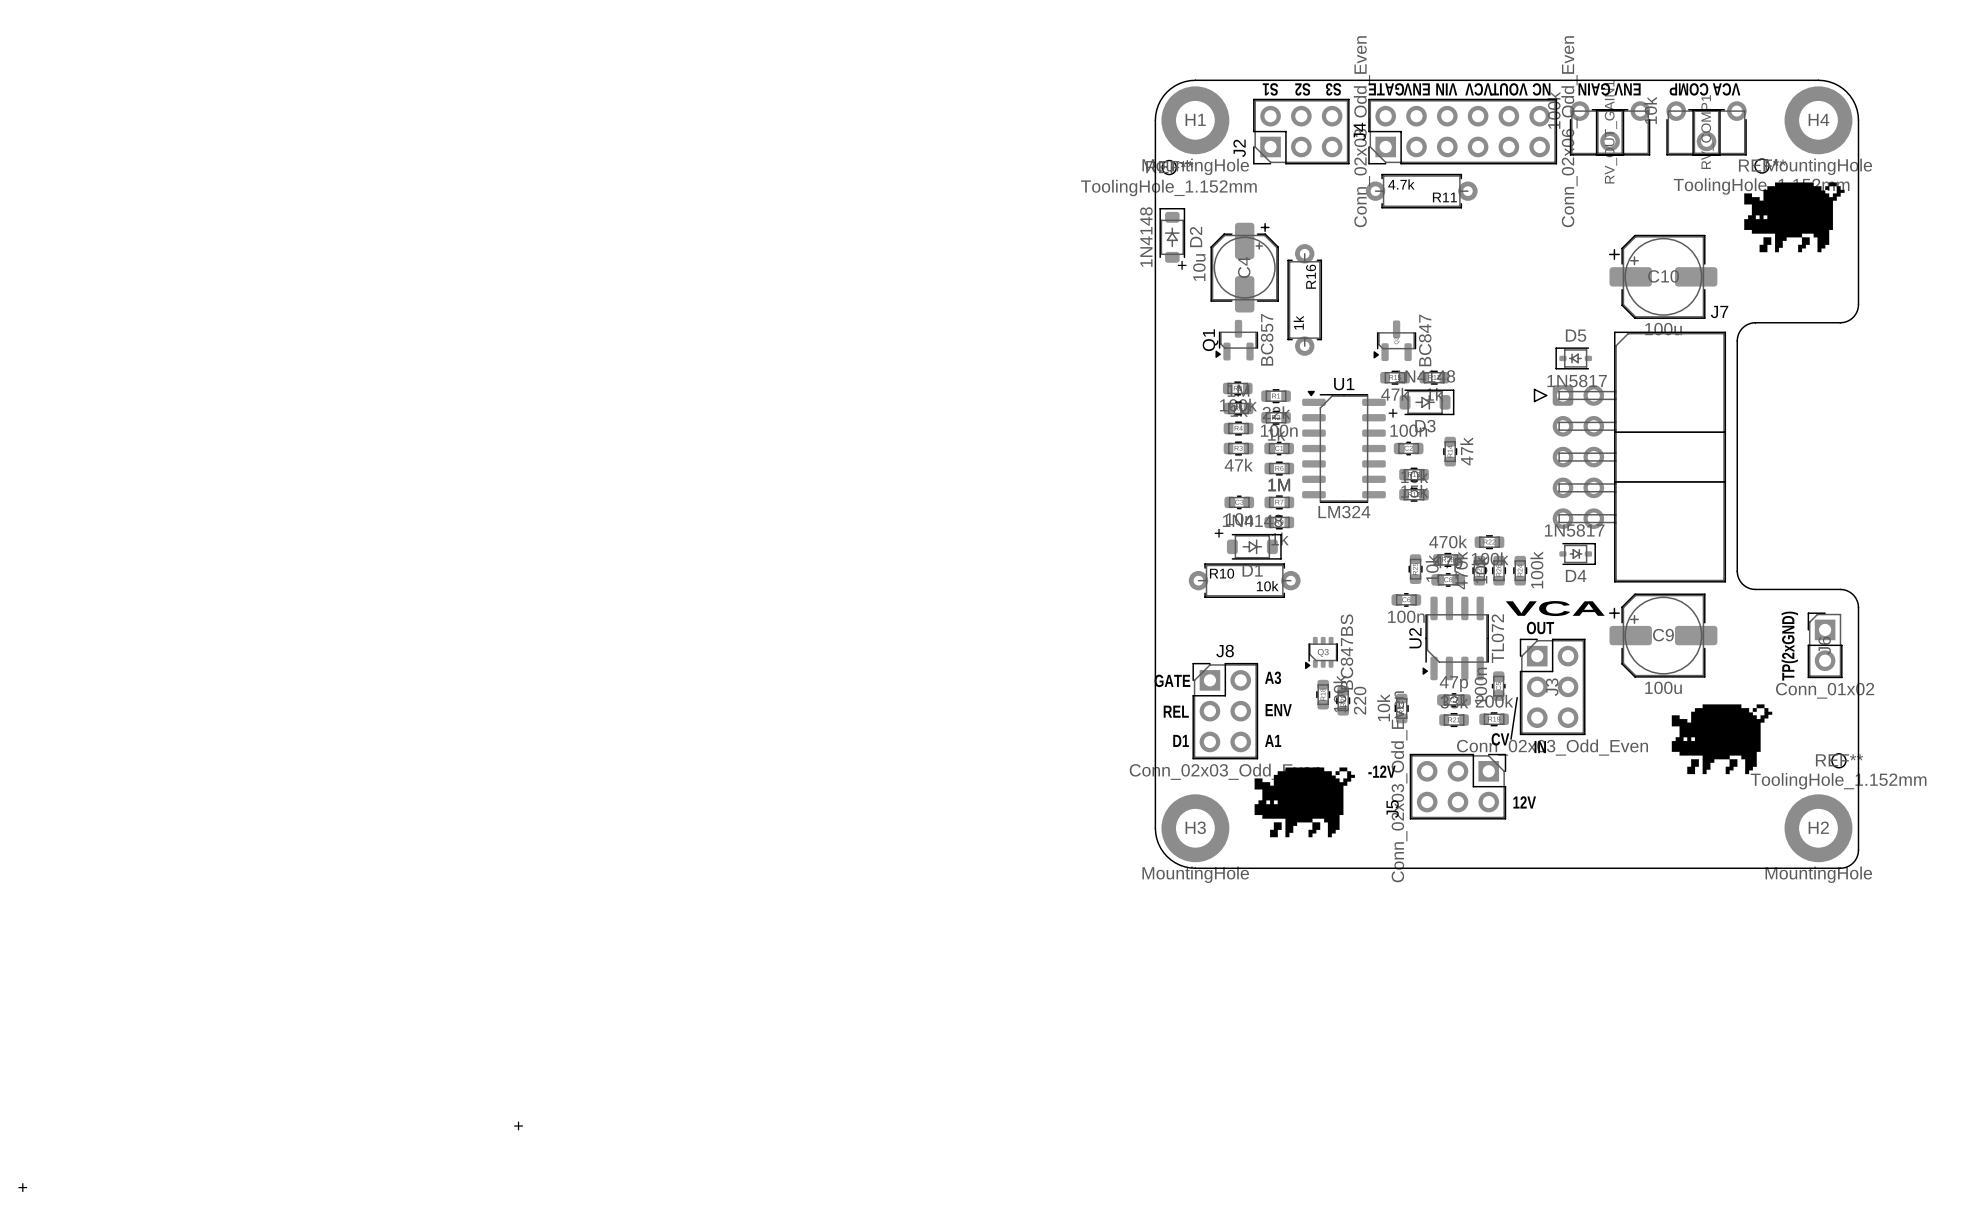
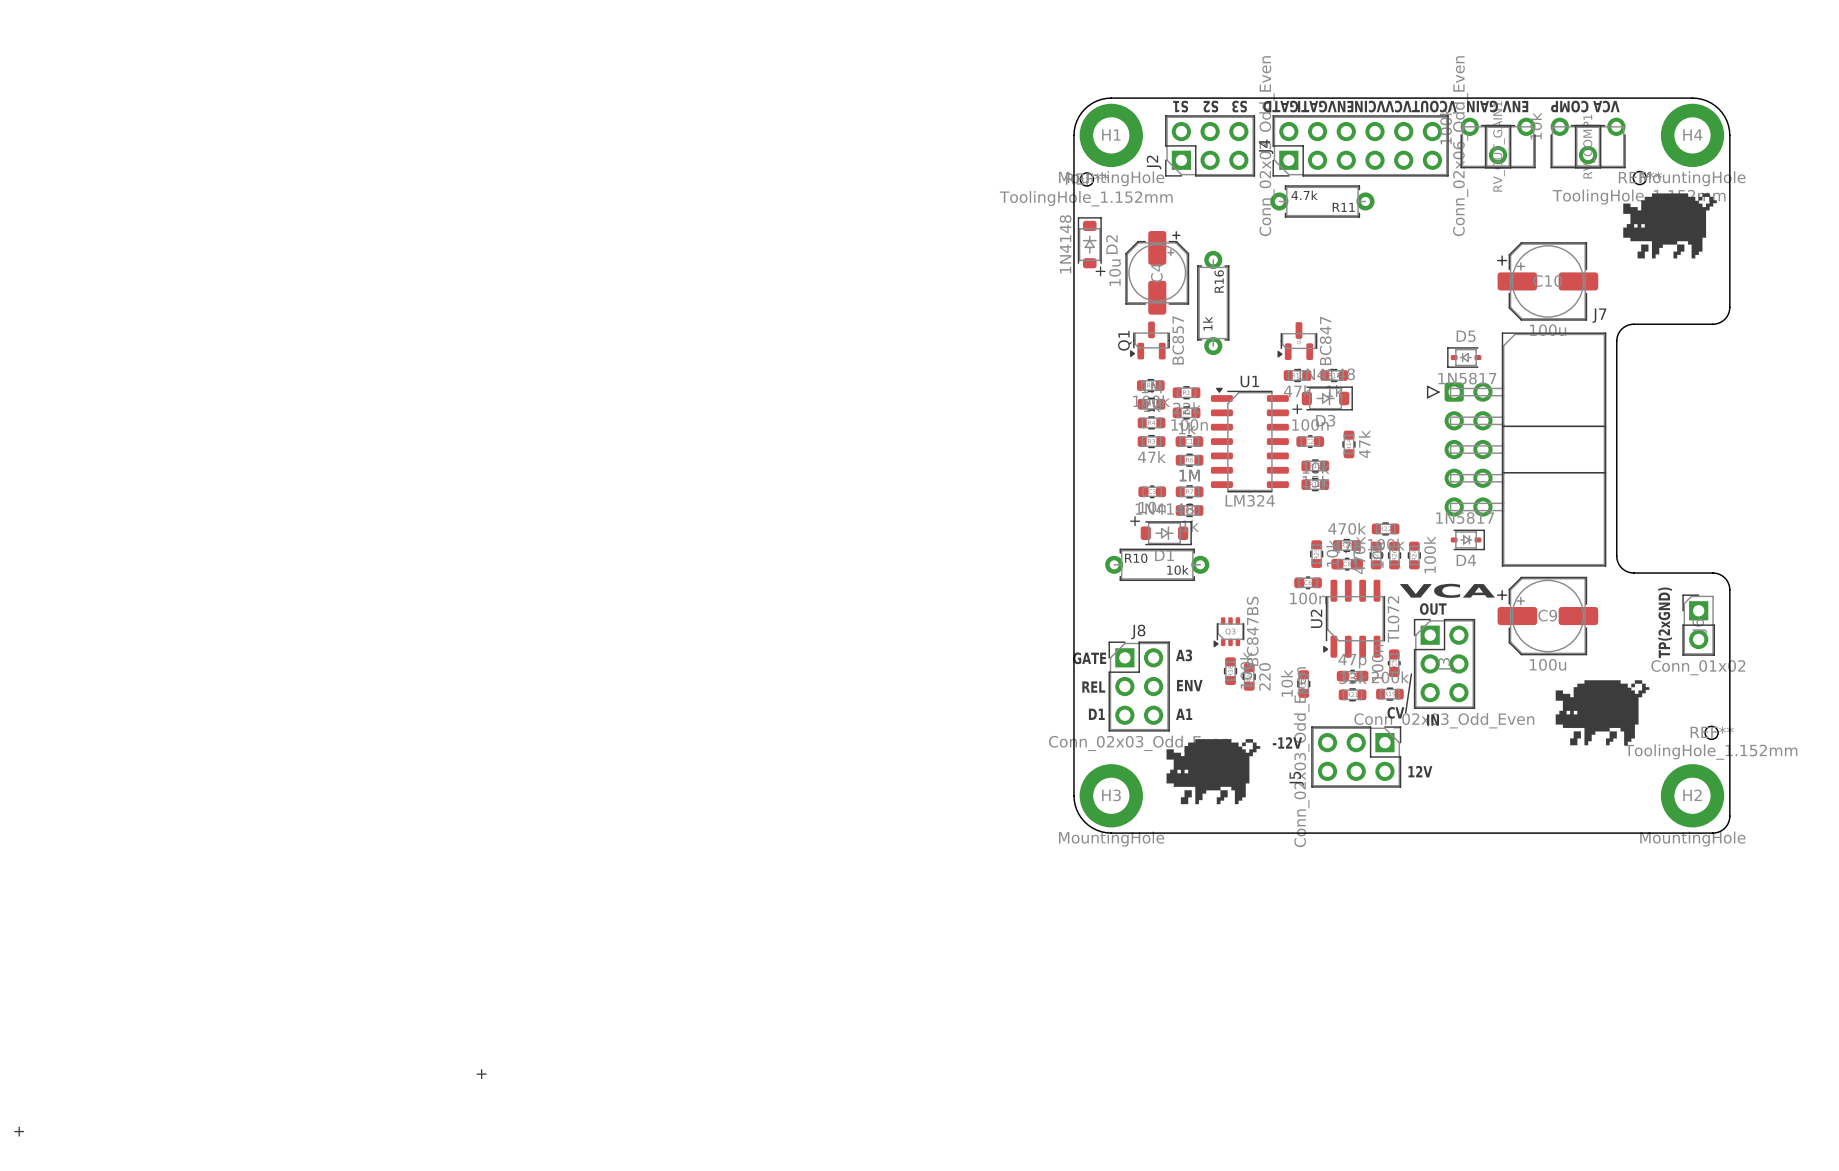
text: GATE (1386, 89) -> GATD (1280, 106)
text: ENV (1416, 89) -> GATI (1312, 106)
text: VIN (1446, 89) -> ENV (1340, 106)
text: VCV (1478, 89) -> VCIN (1370, 106)
text: VOUT (1509, 89) -> VCV (1398, 106)
text: NC (1541, 89) -> VCOUT (1434, 106)

